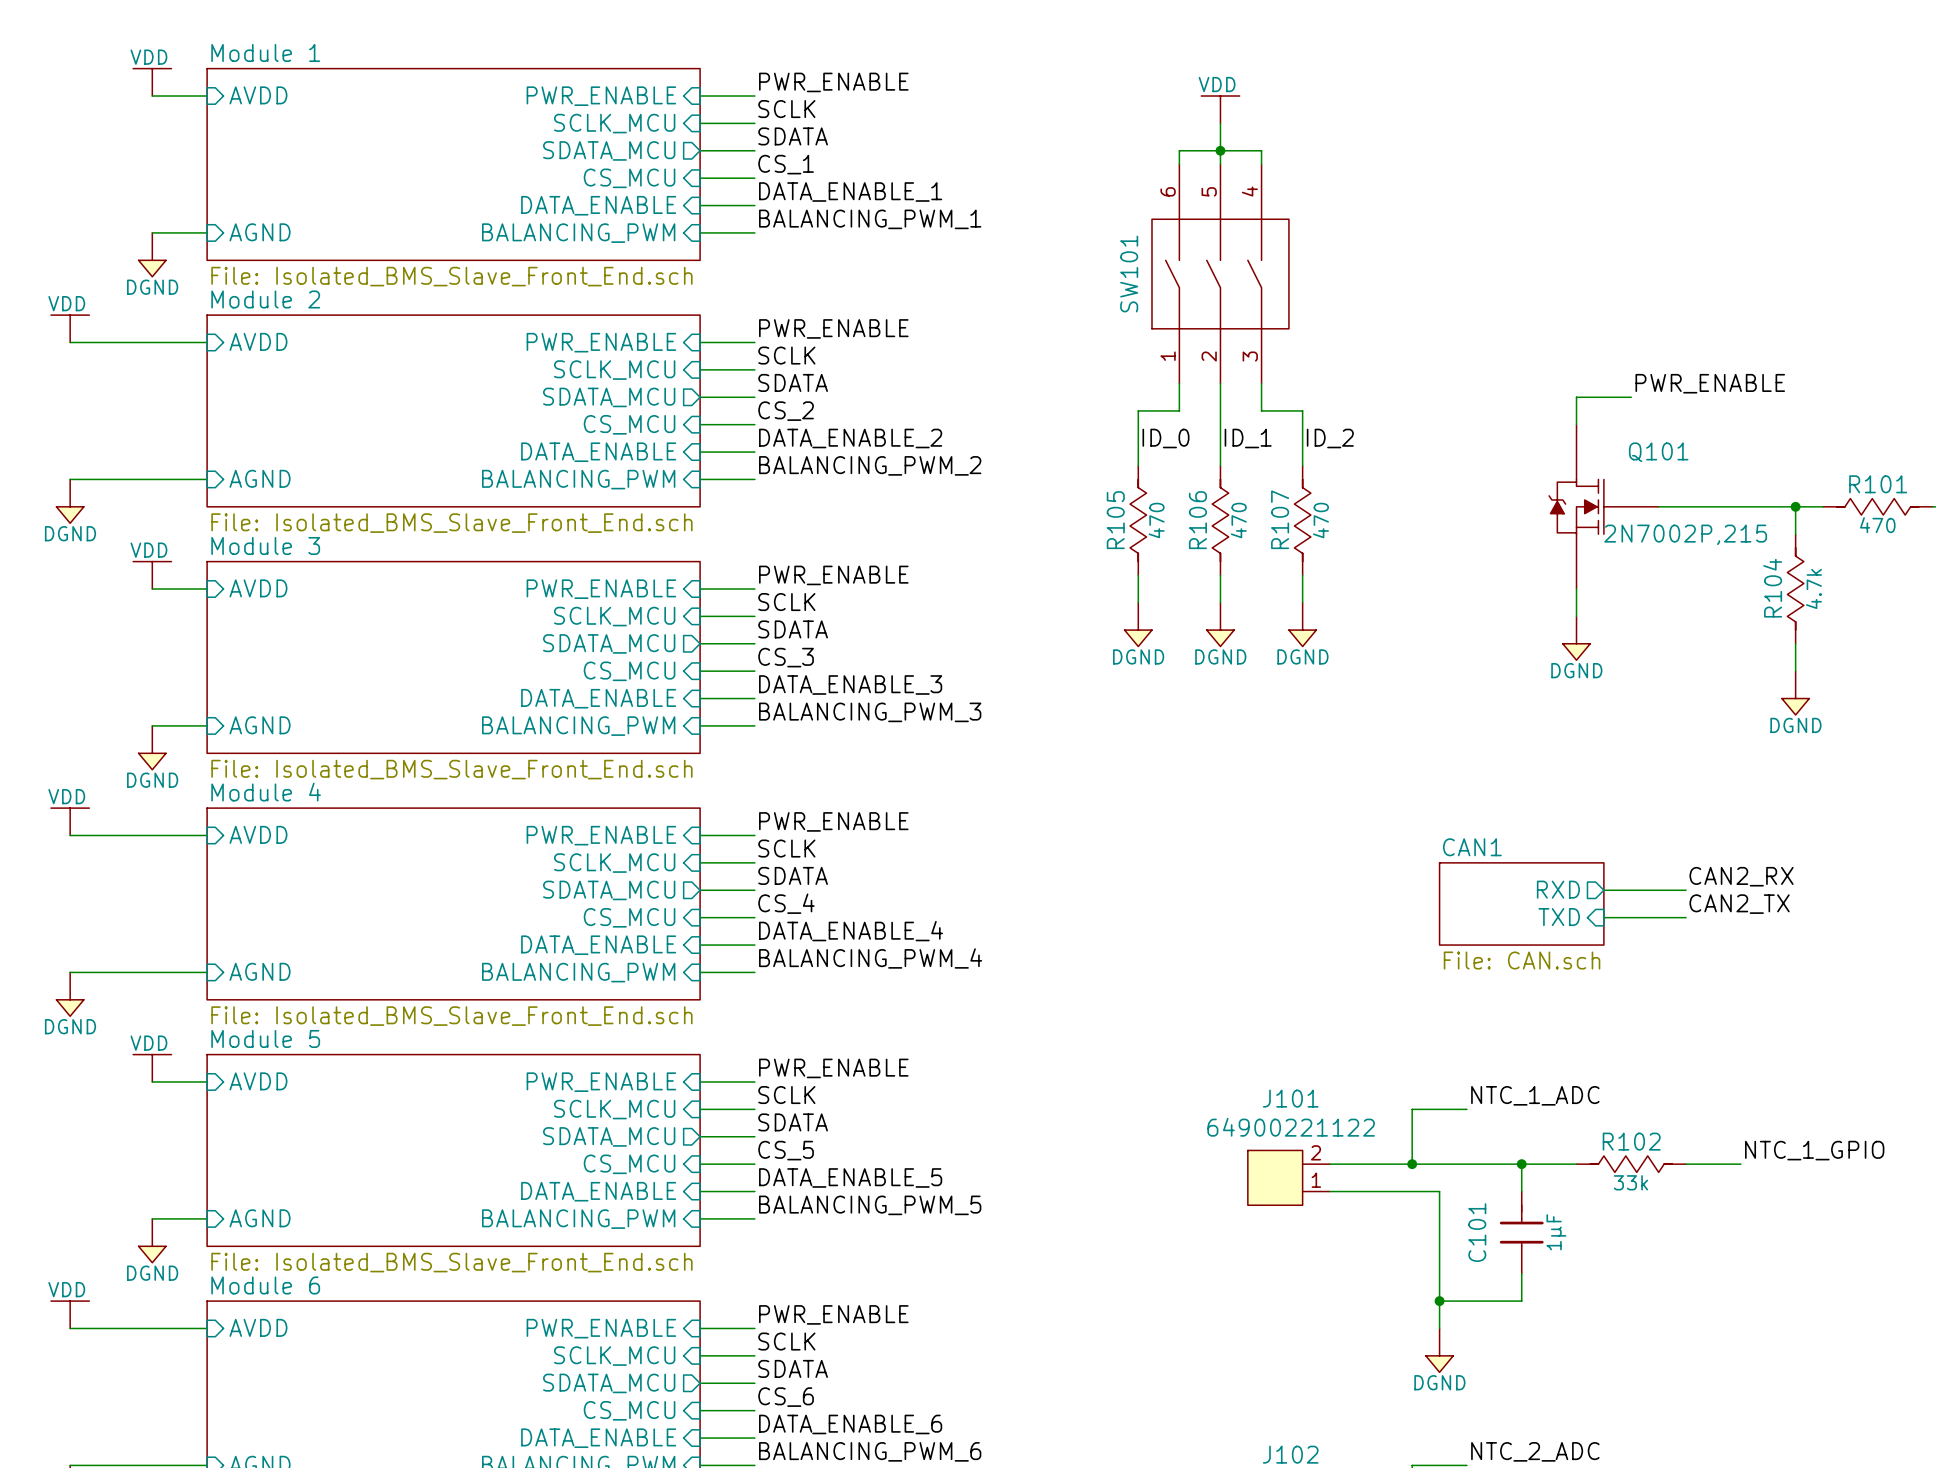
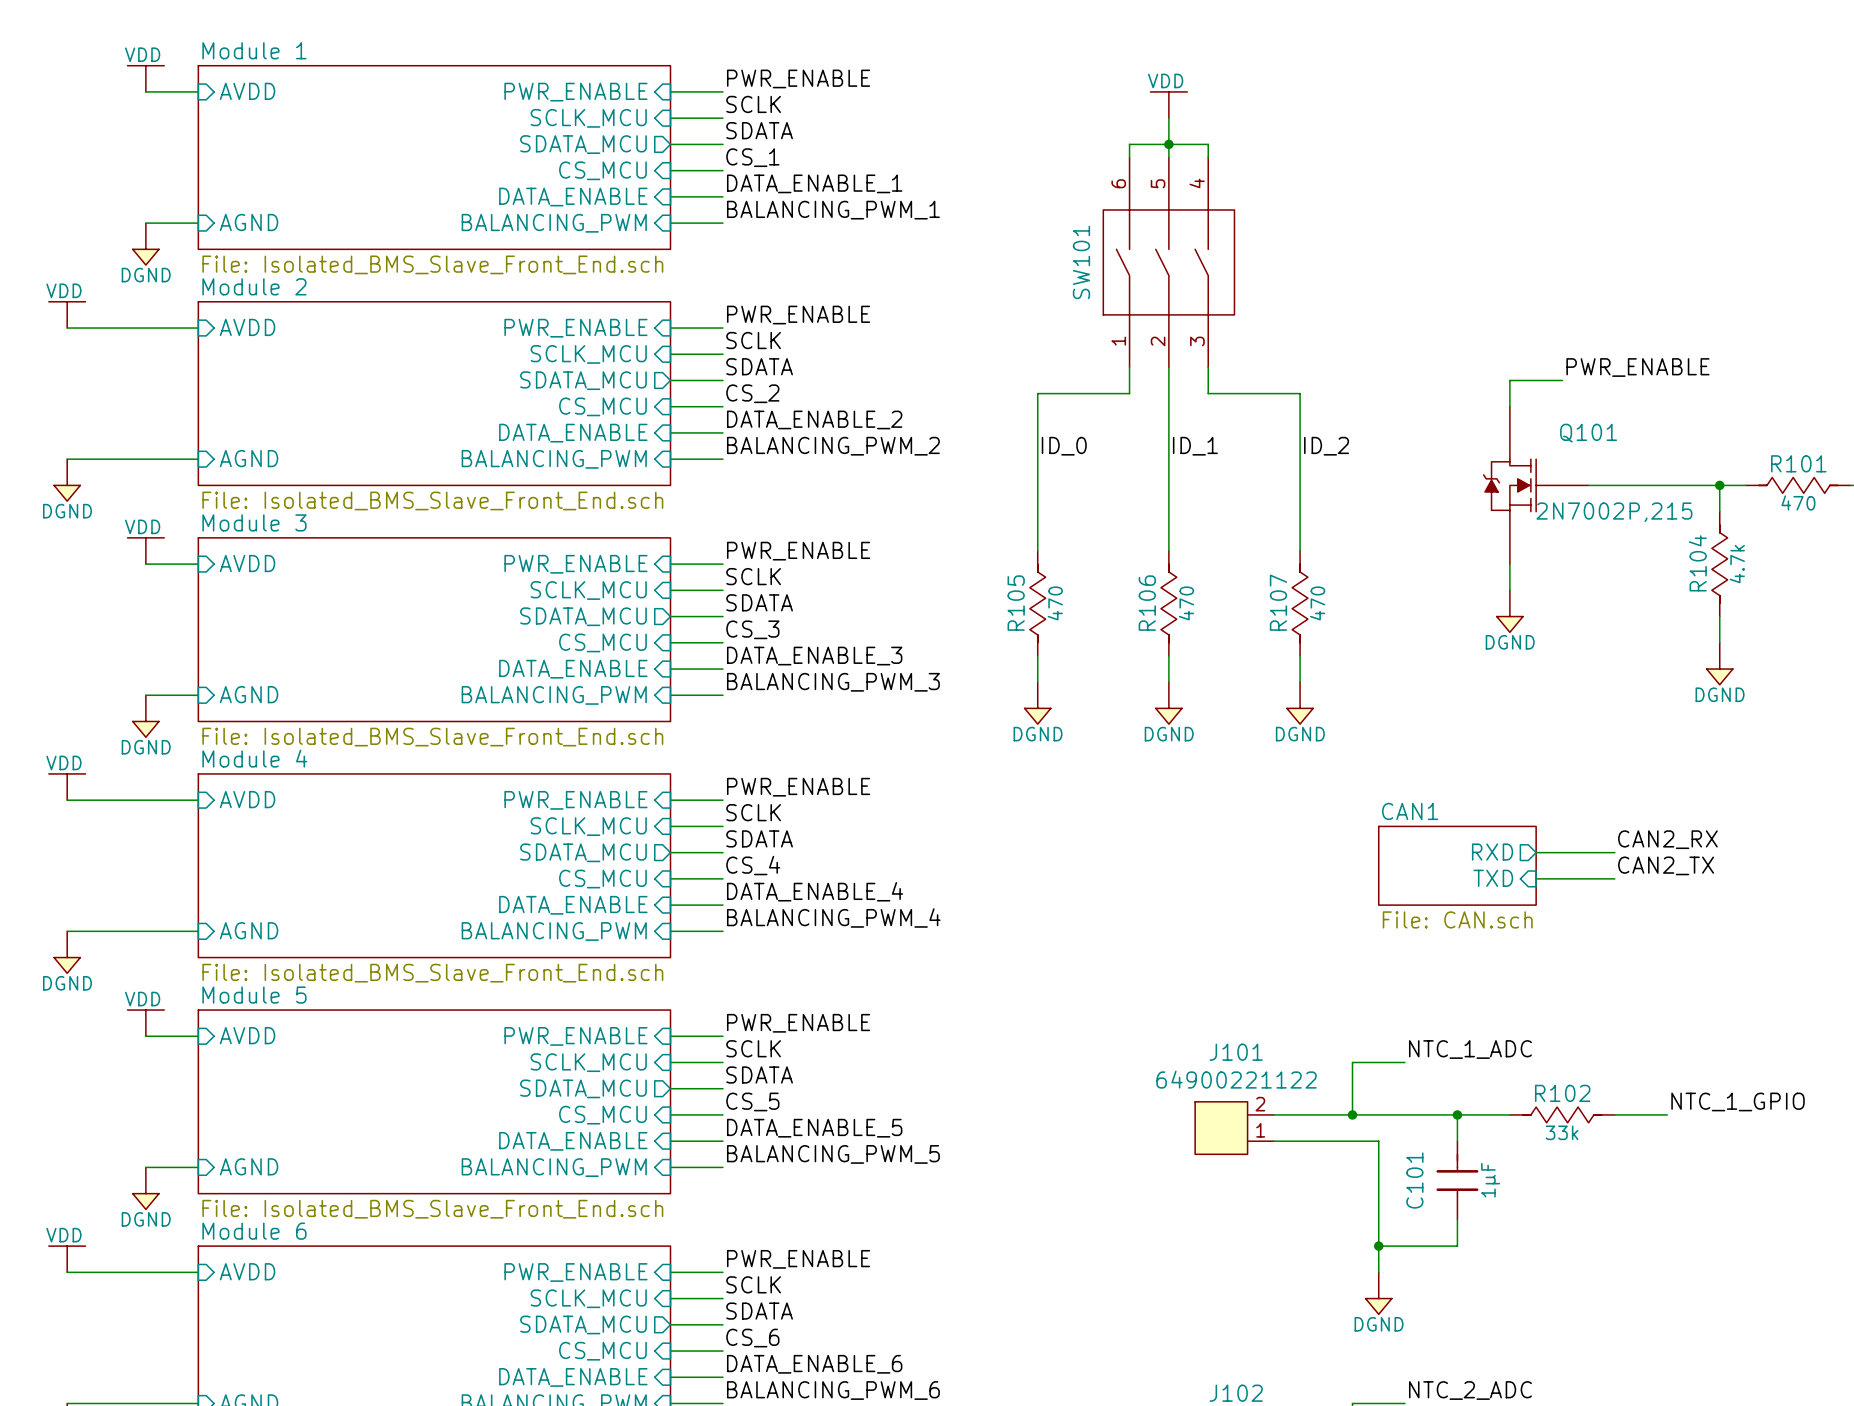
wire: (1138, 410) (1138, 465) -> (1090, 393) (1037, 393) (1037, 550)
wire: (1302, 410) (1302, 465) -> (1247, 393) (1300, 393) (1300, 550)
label position: ID_0 (1165, 438) -> ID_0 (1064, 446)
label position: ID_1 (1248, 438) -> ID_1 (1195, 446)
label position: ID_2 (1330, 438) -> ID_2 (1326, 446)
R105 position: (1138, 520) -> (1037, 603)
R106 position: (1220, 520) -> (1168, 603)
R107 position: (1302, 520) -> (1300, 603)
wire: (1138, 575) (1138, 602) -> (1037, 655) (1037, 682)
wire: (1302, 575) (1302, 602) -> (1300, 655) (1300, 682)
power symbol: DGND (1138, 624) -> none
power symbol: DGND (1220, 624) -> none
power symbol: DGND (1302, 624) -> none
wire: none -> (1168, 655) (1168, 682)
power symbol: none -> DGND (1037, 703)
power symbol: none -> DGND (1168, 703)
power symbol: none -> DGND (1300, 703)

